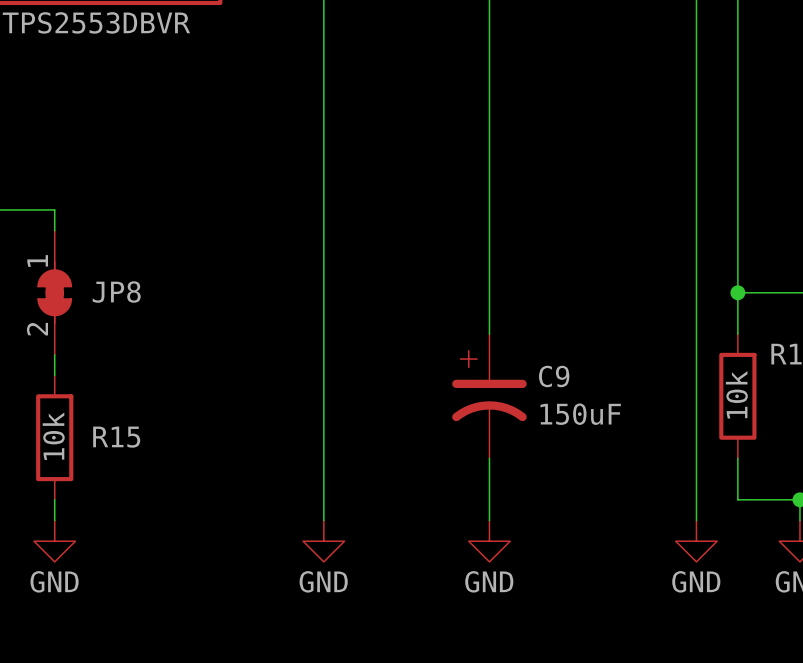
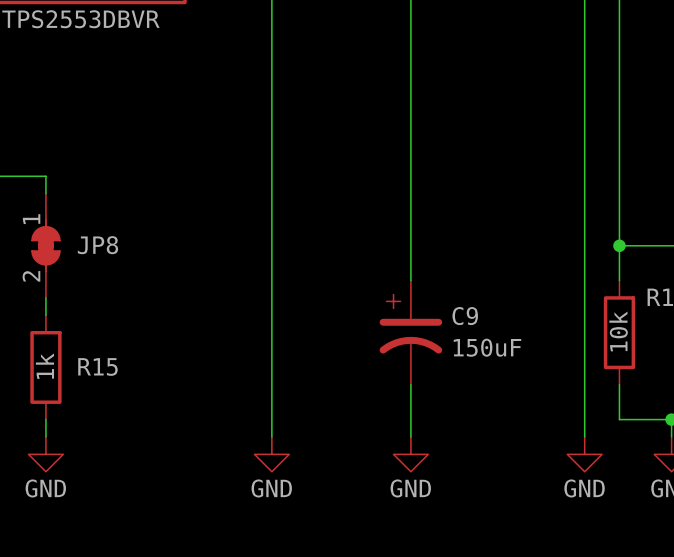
R15 value: 10k (53, 436) -> 1k (44, 366)

